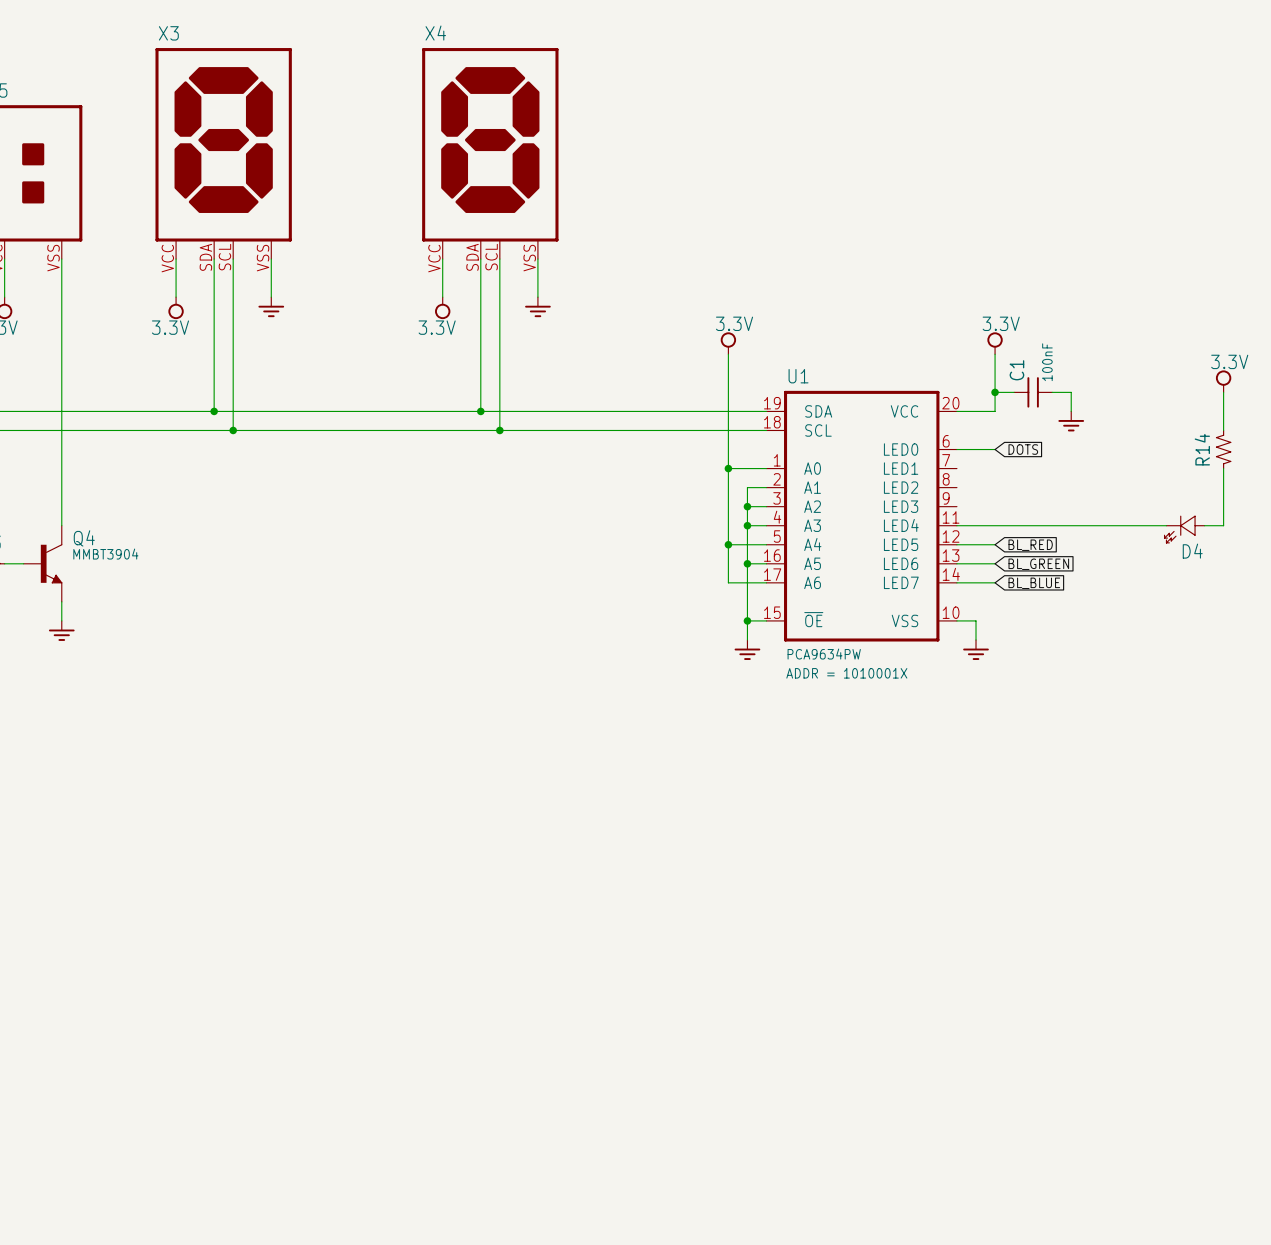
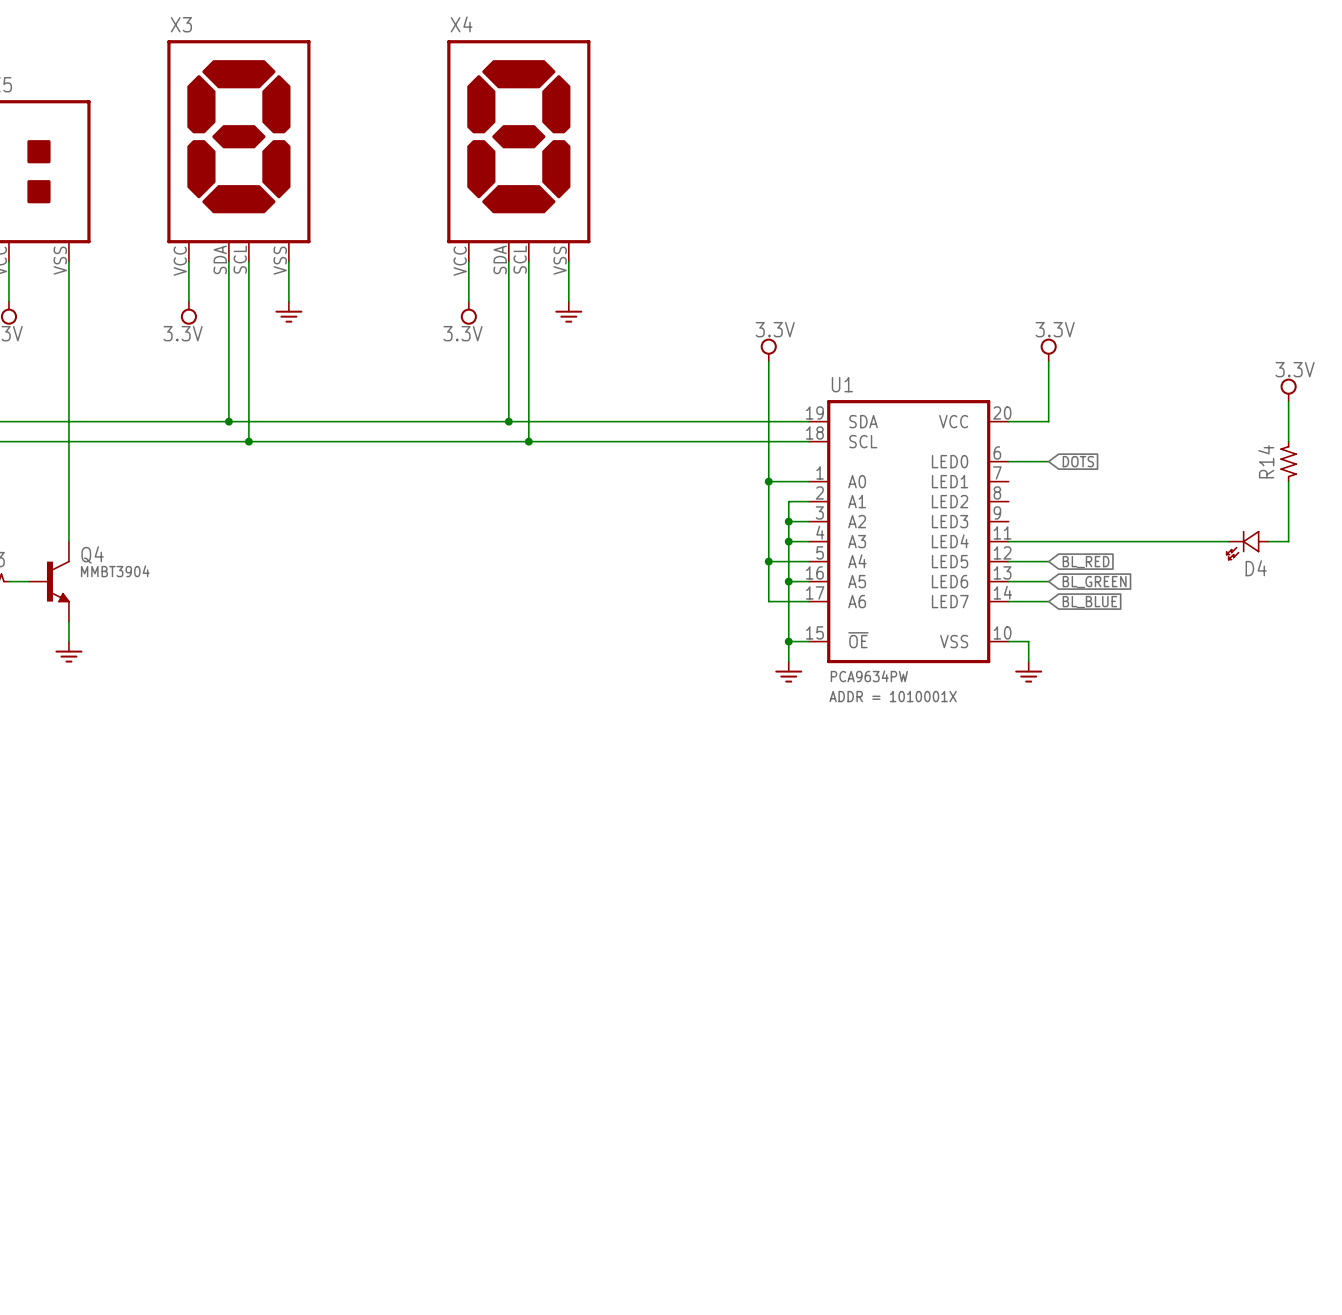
wire: (995, 392) (1014, 392) -> none
junction: (995, 392) -> none
C1: 100nF (1033, 392) -> none
wire: (1052, 392) (1071, 392) (1071, 411) -> none
power symbol: (1071, 421) -> none

